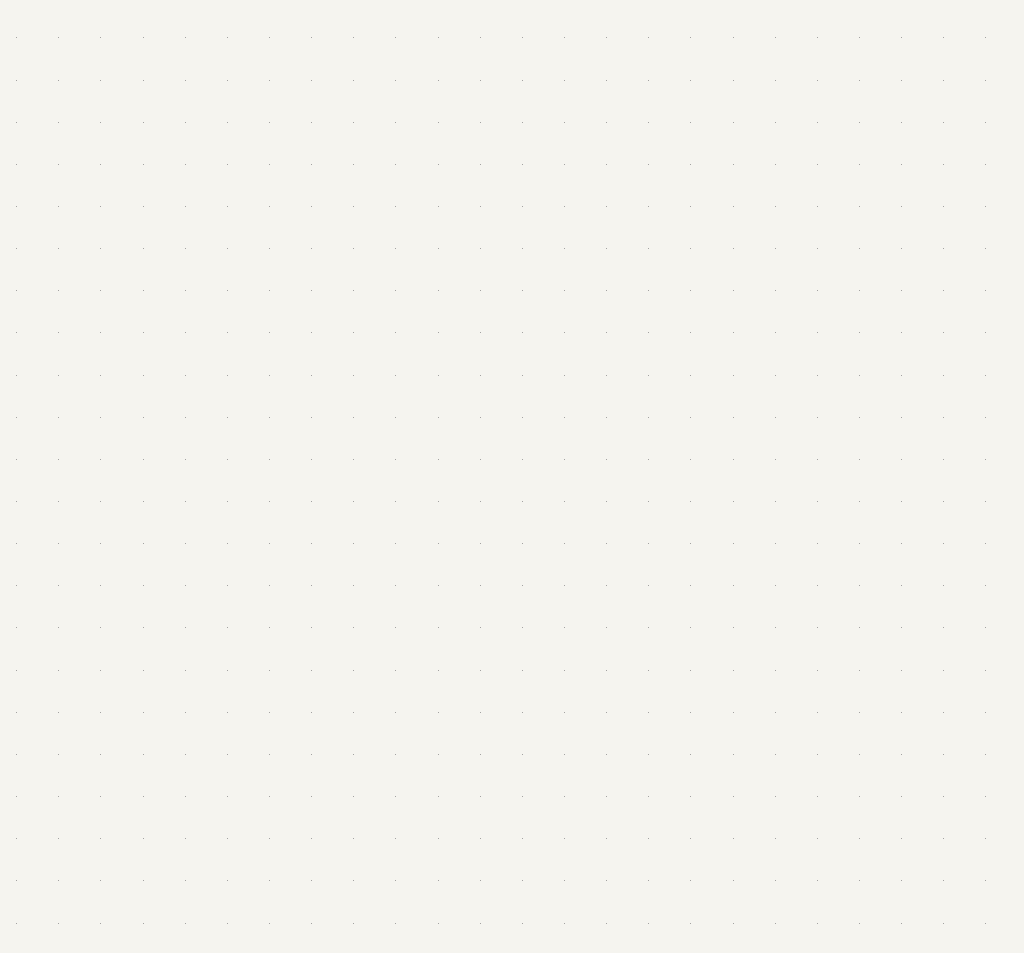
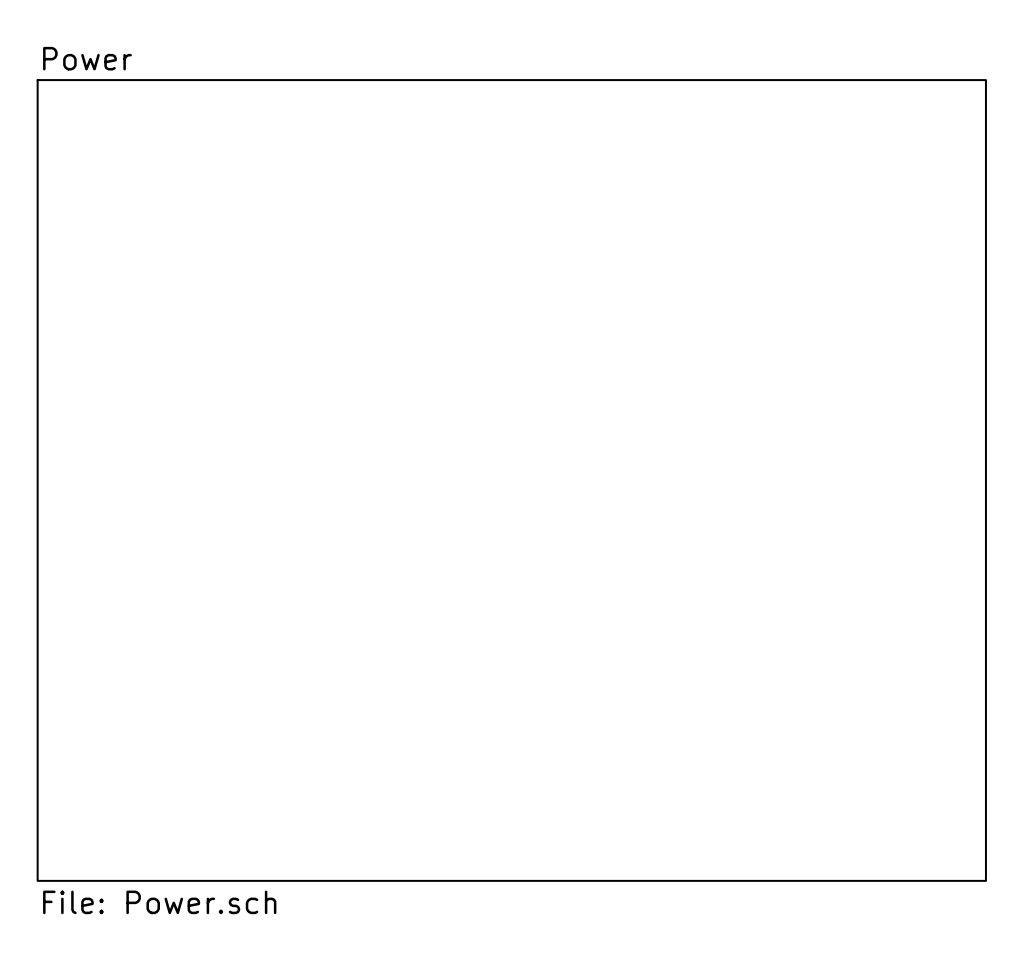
sheet Power: none -> File: Power.sch (511, 480)

